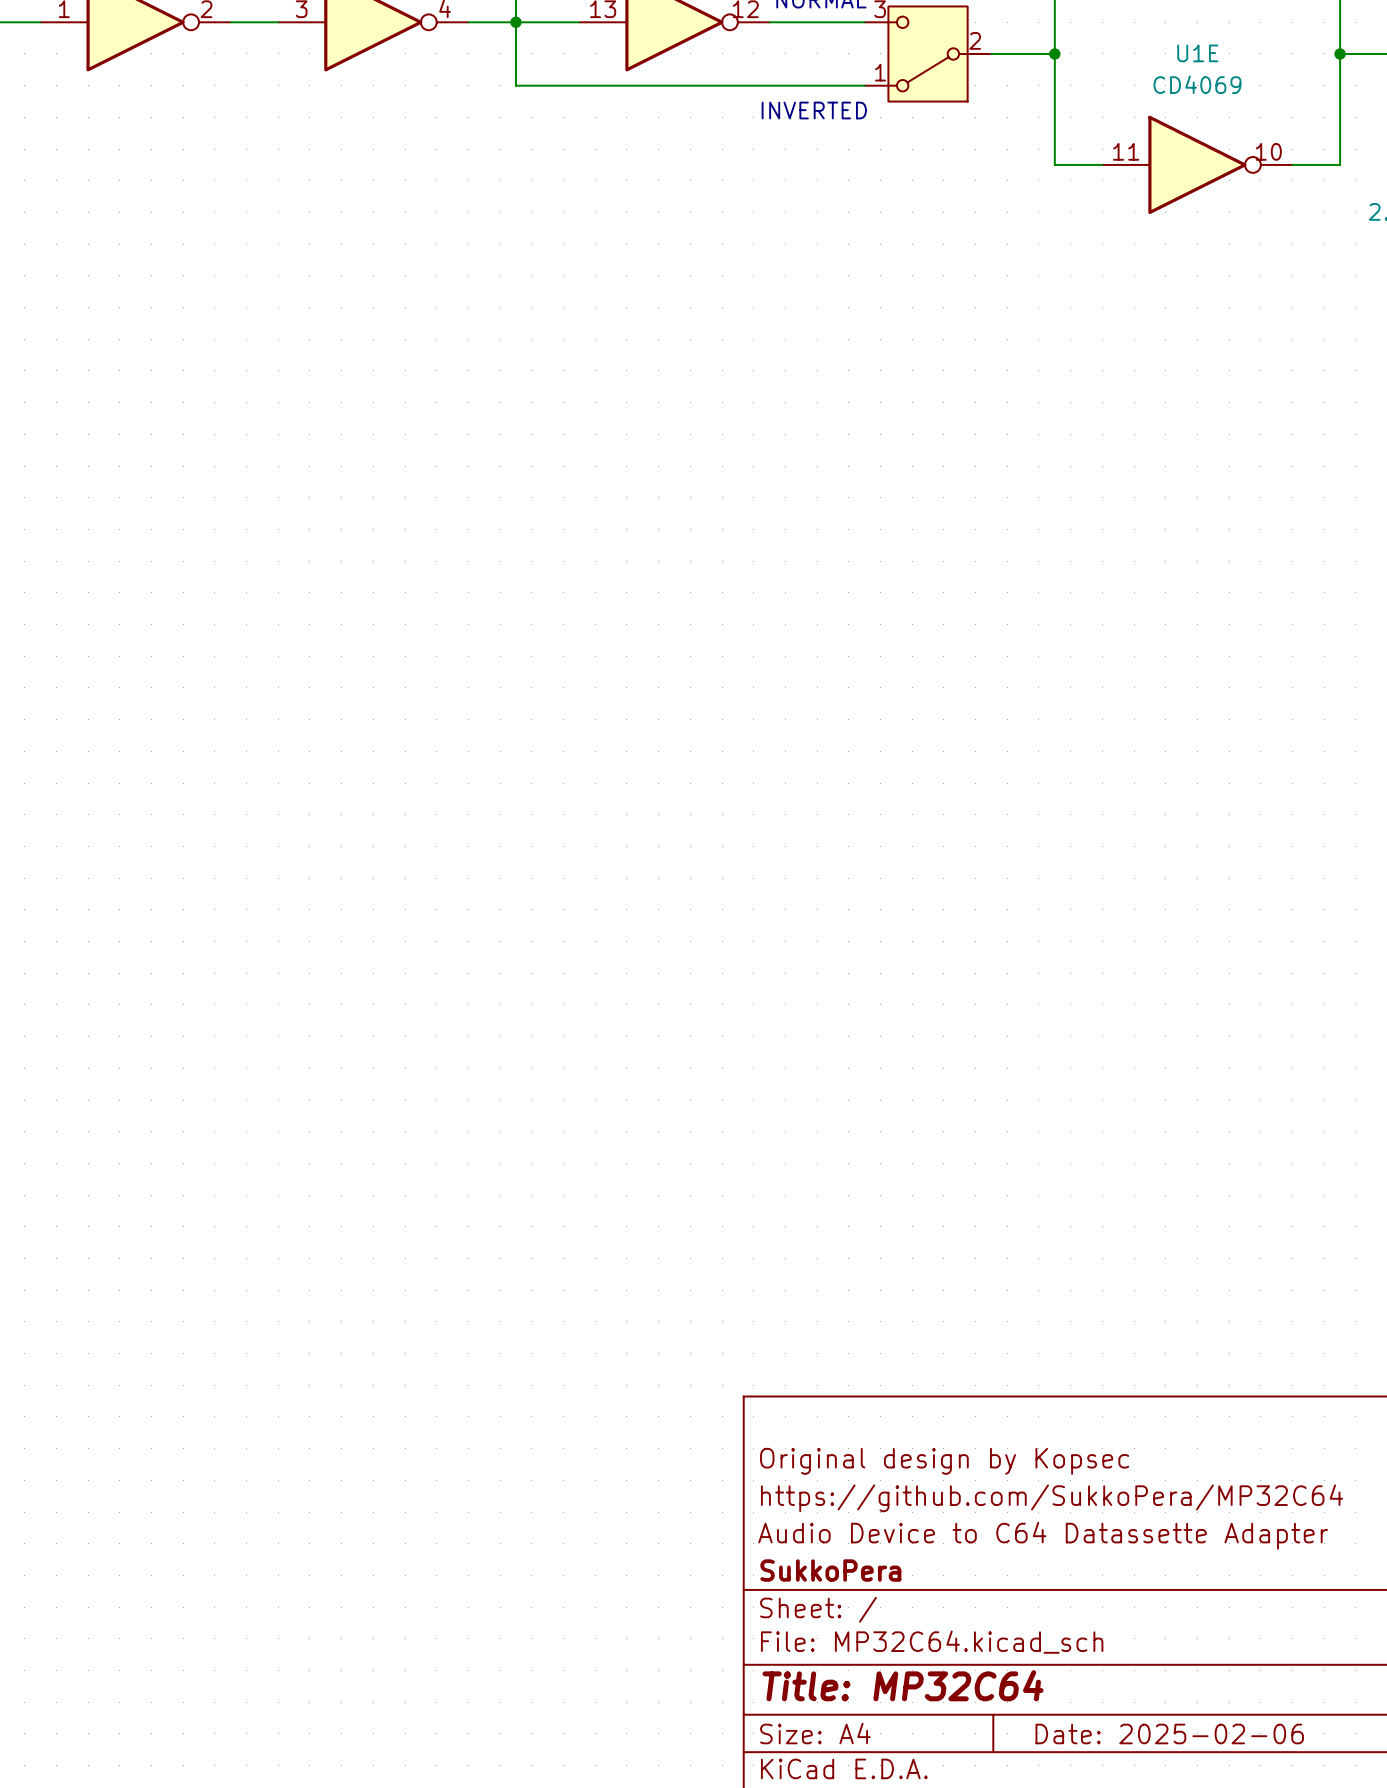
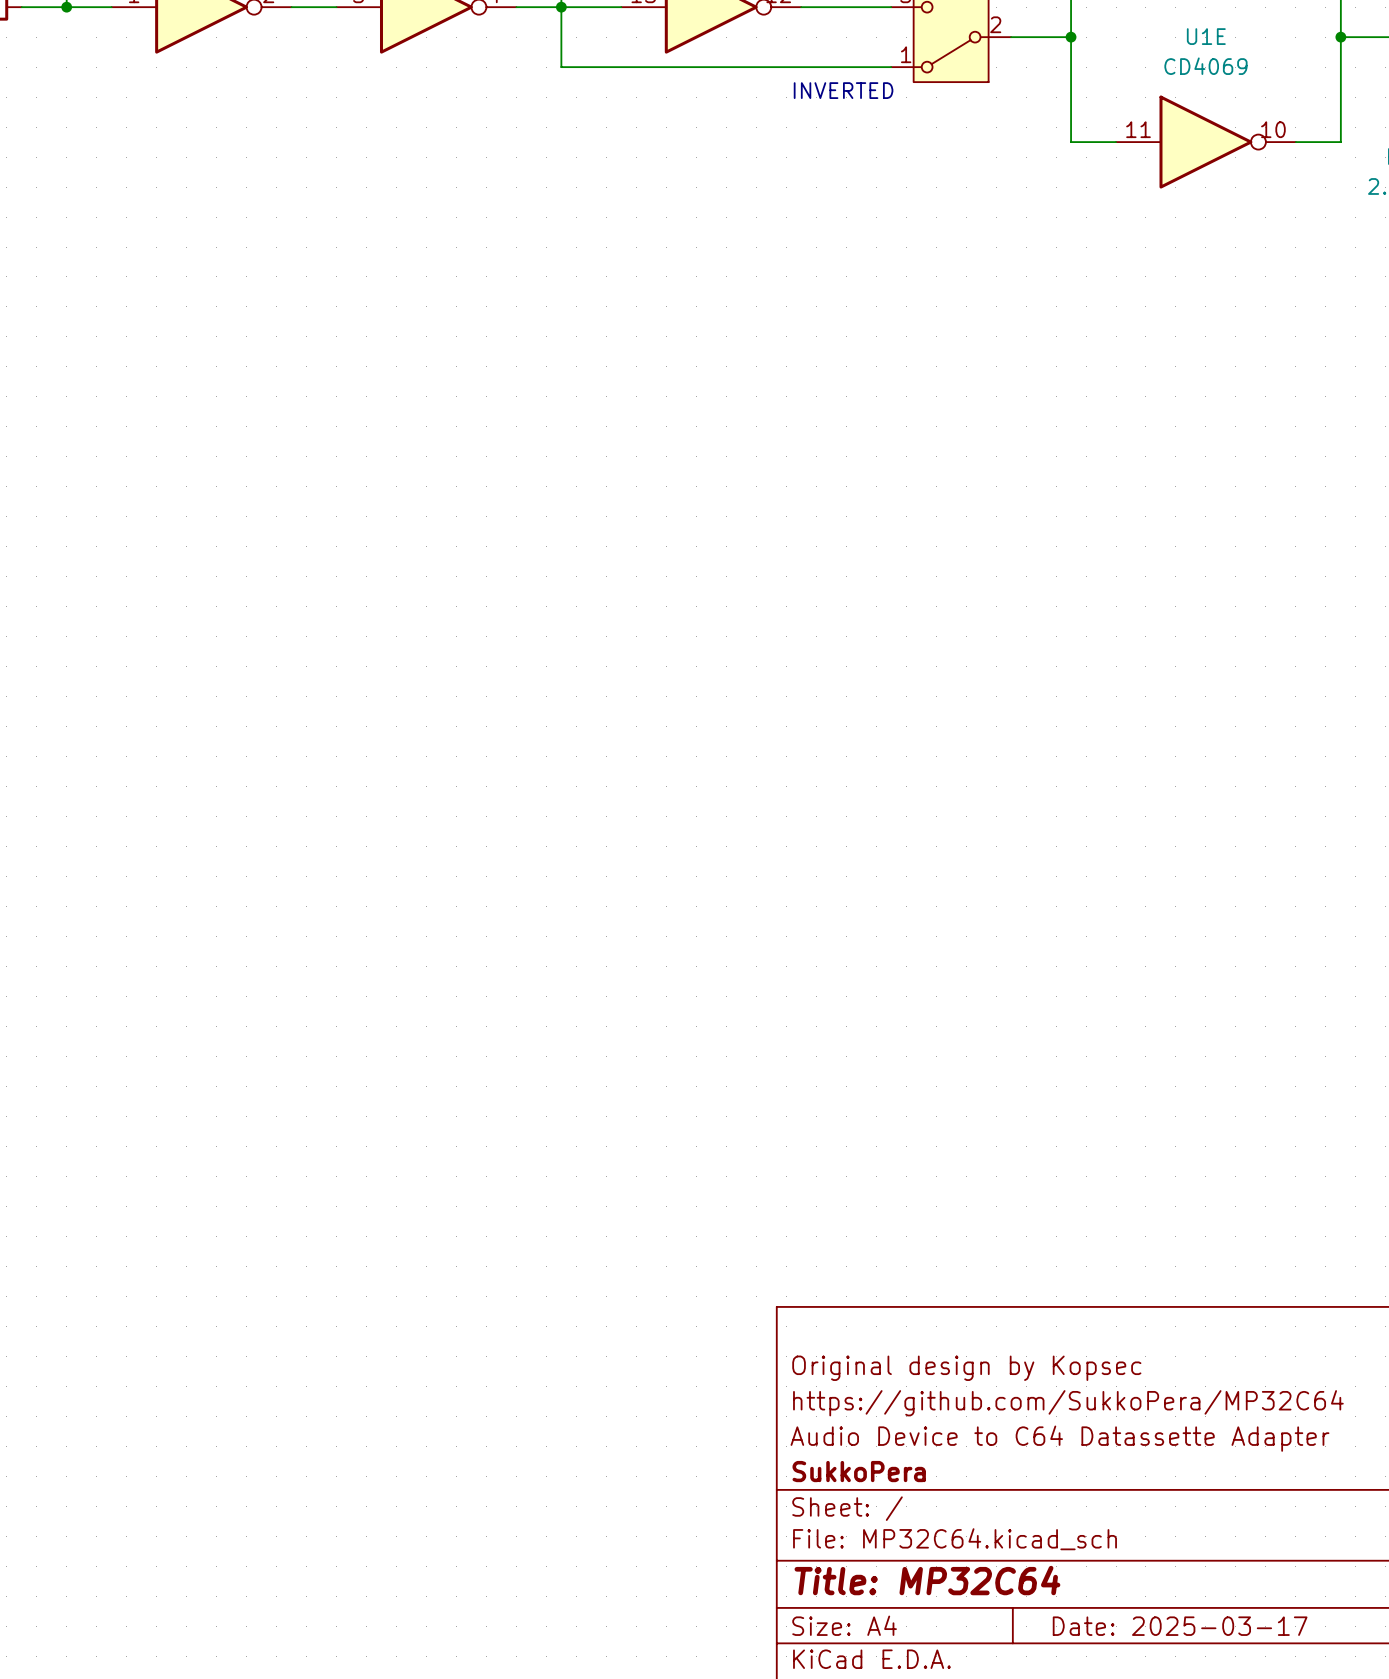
title block: Date: 2025-02-06 (1169, 1733) -> Date: 2025-03-17 (1180, 1626)

